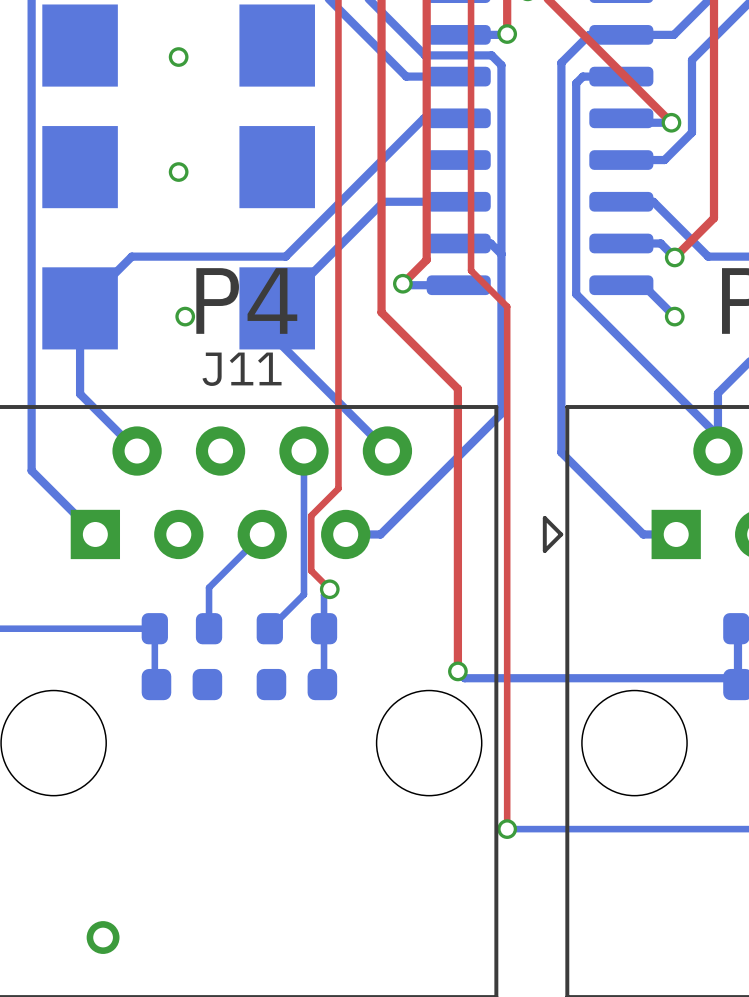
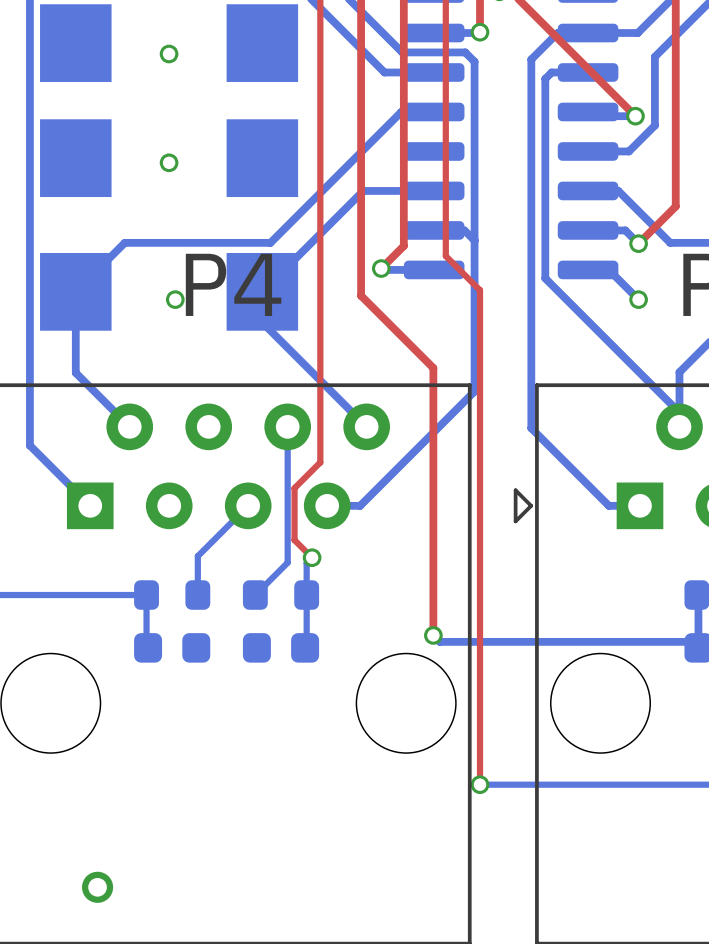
J11 name: J11 (242, 369) -> none

